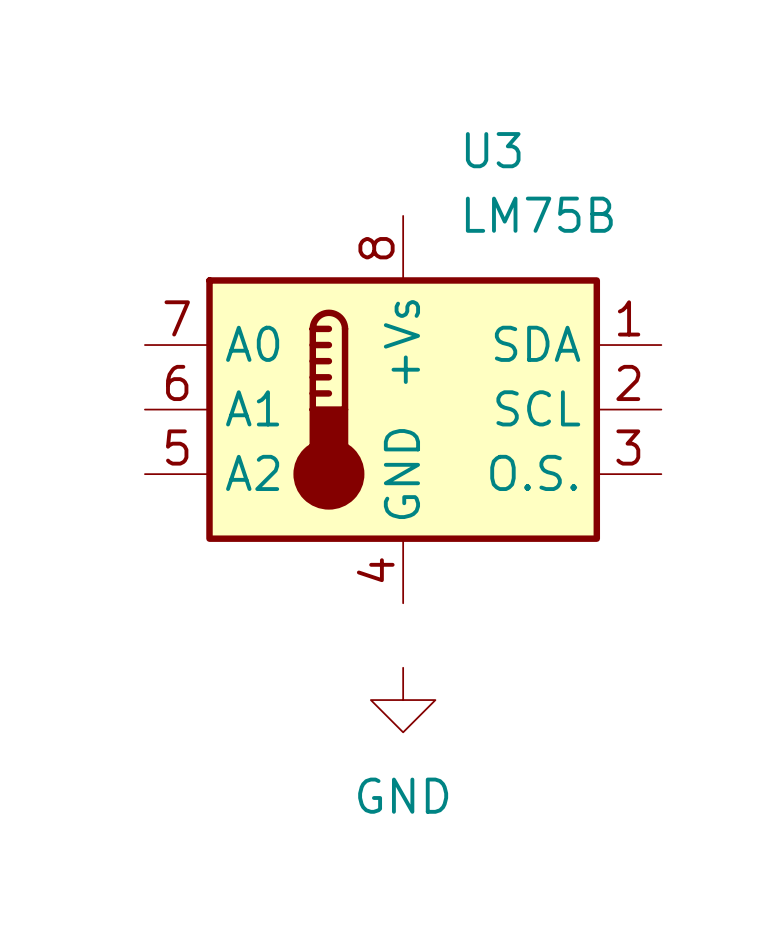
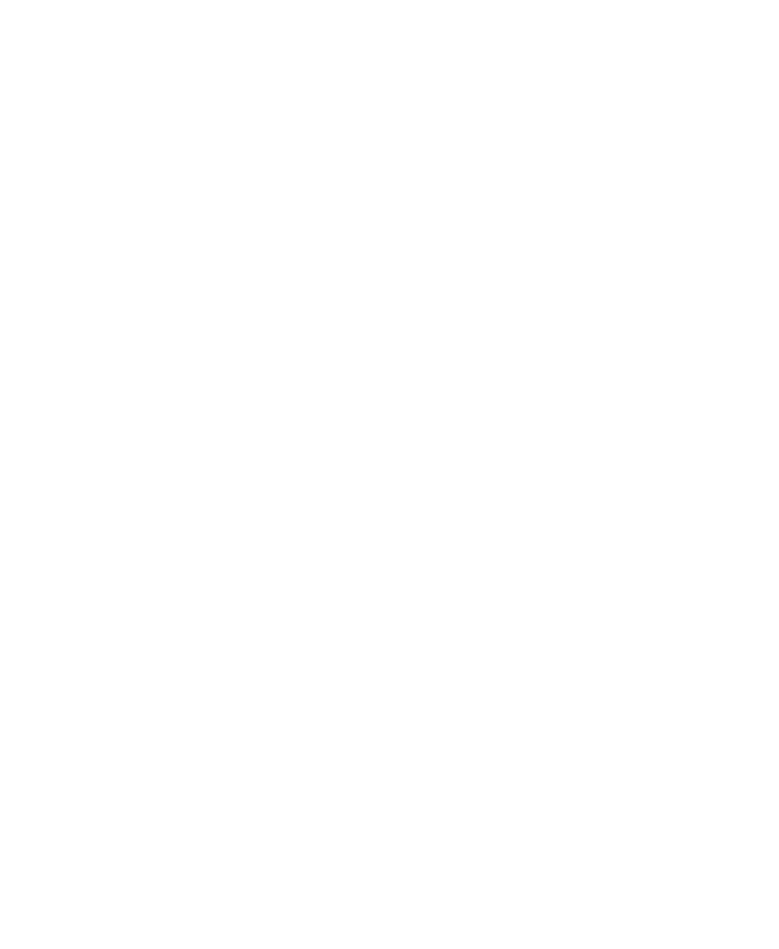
U3: LM75B (403, 409) -> none
power symbol: GND (403, 700) -> none

